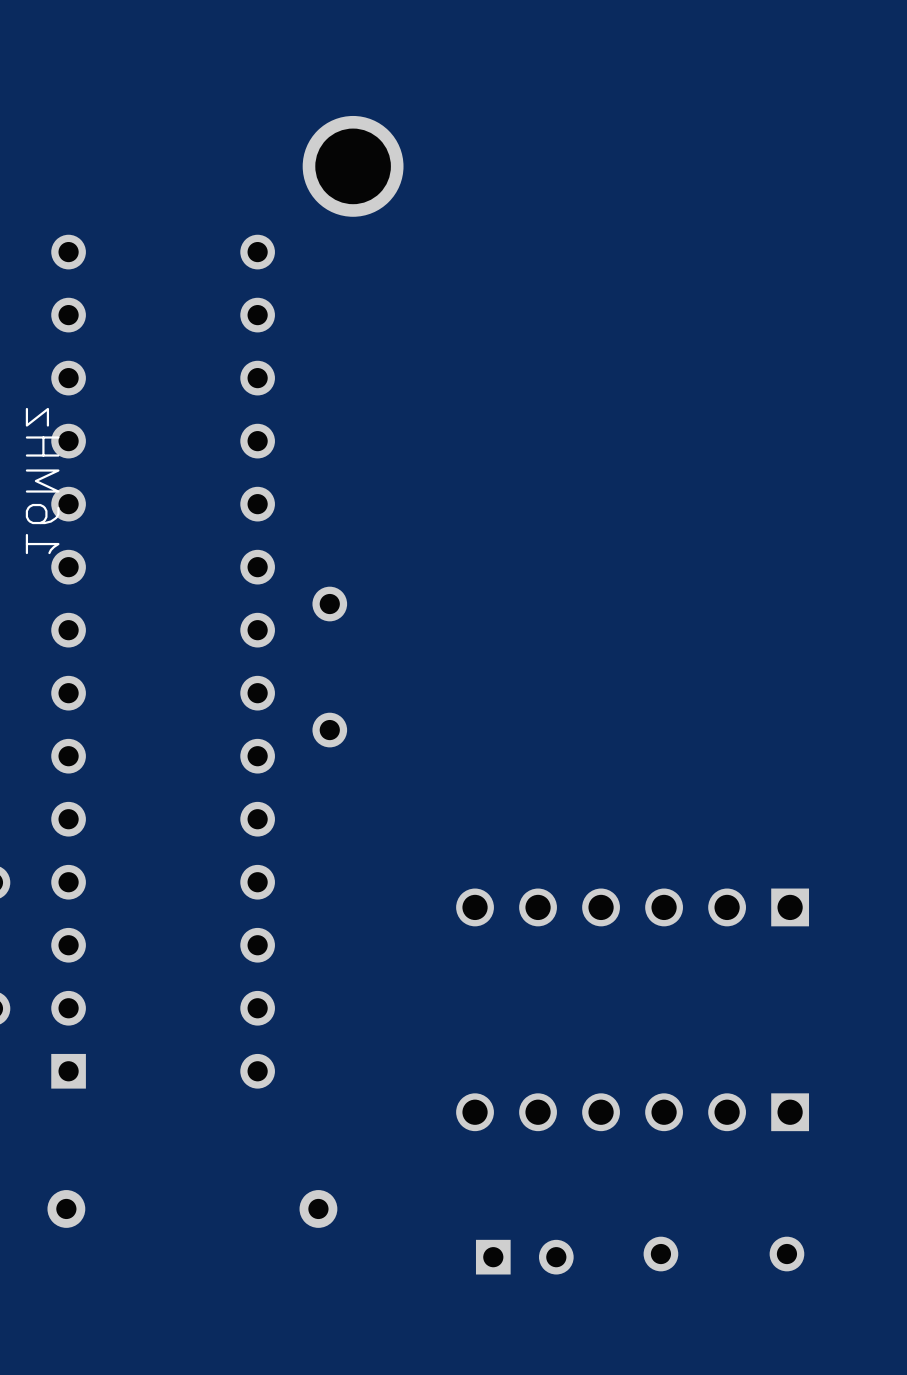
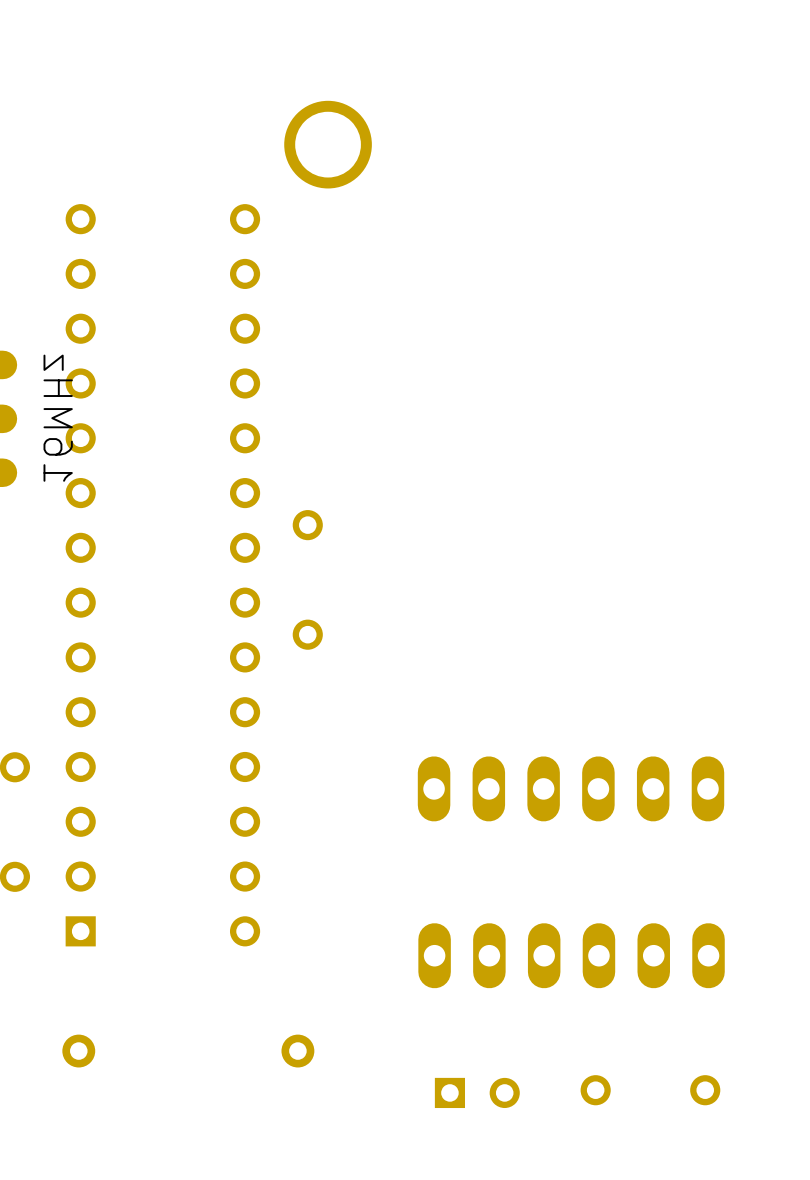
part footprint: [456, 888, 810, 927] -> [417, 756, 725, 822]
part footprint: [456, 1093, 810, 1132] -> [418, 923, 725, 989]

